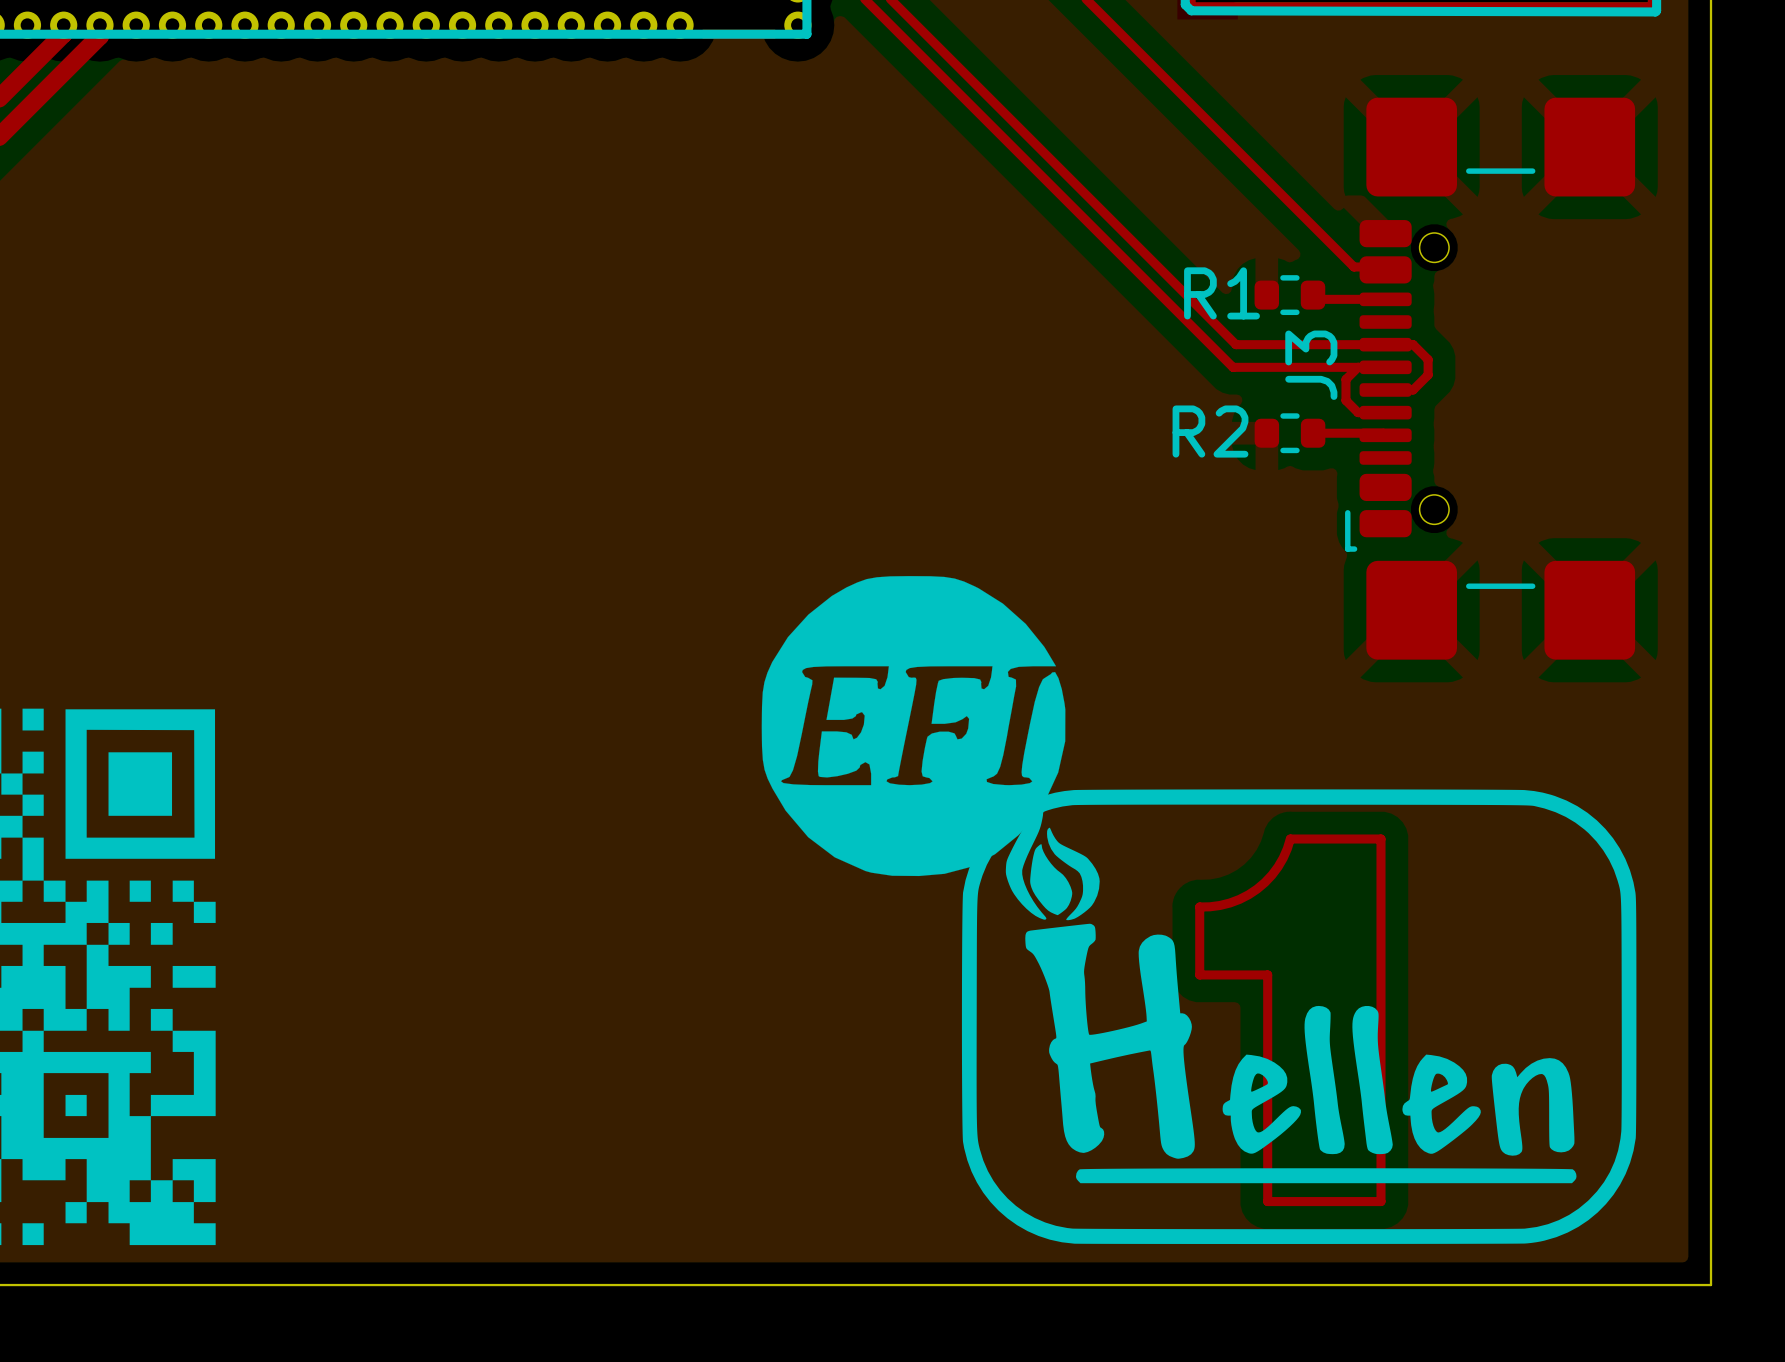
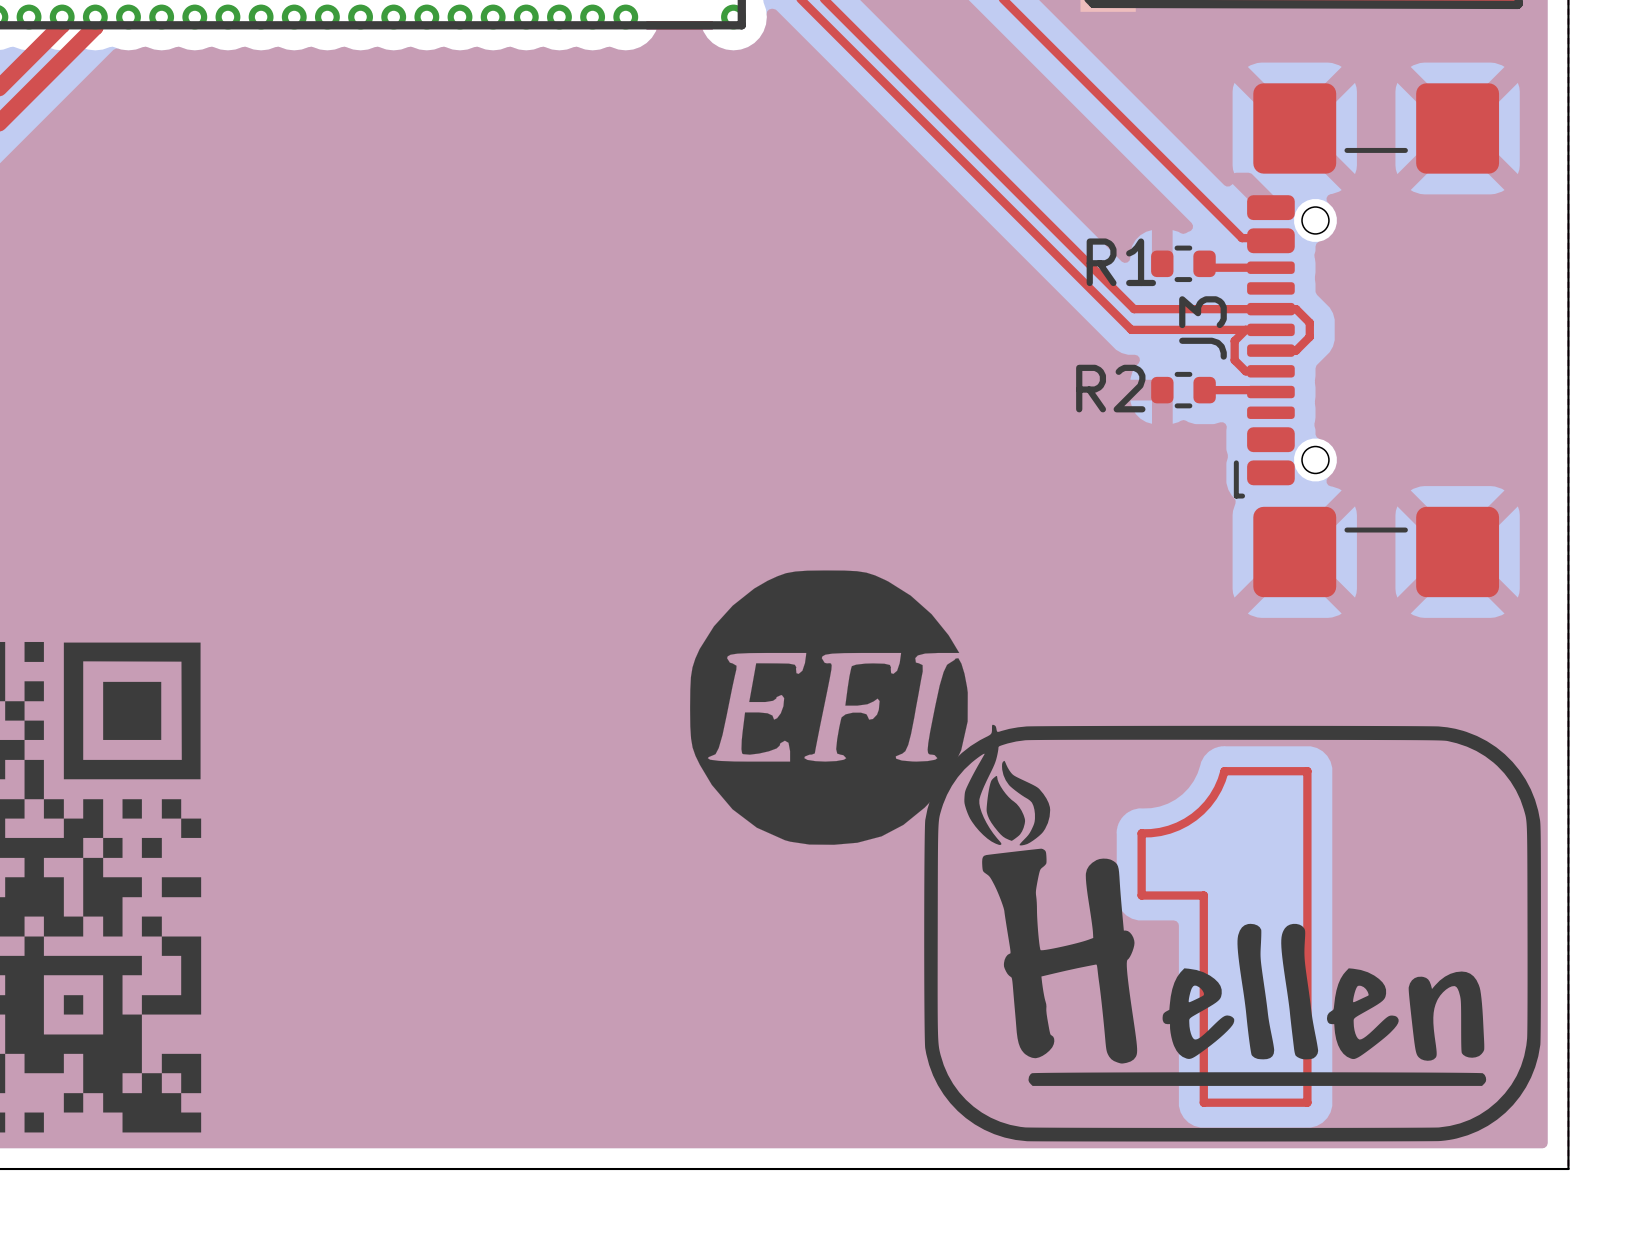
drawing position: (913, 726) -> (828, 707)
drawing position: (1299, 1016) -> (1232, 933)

